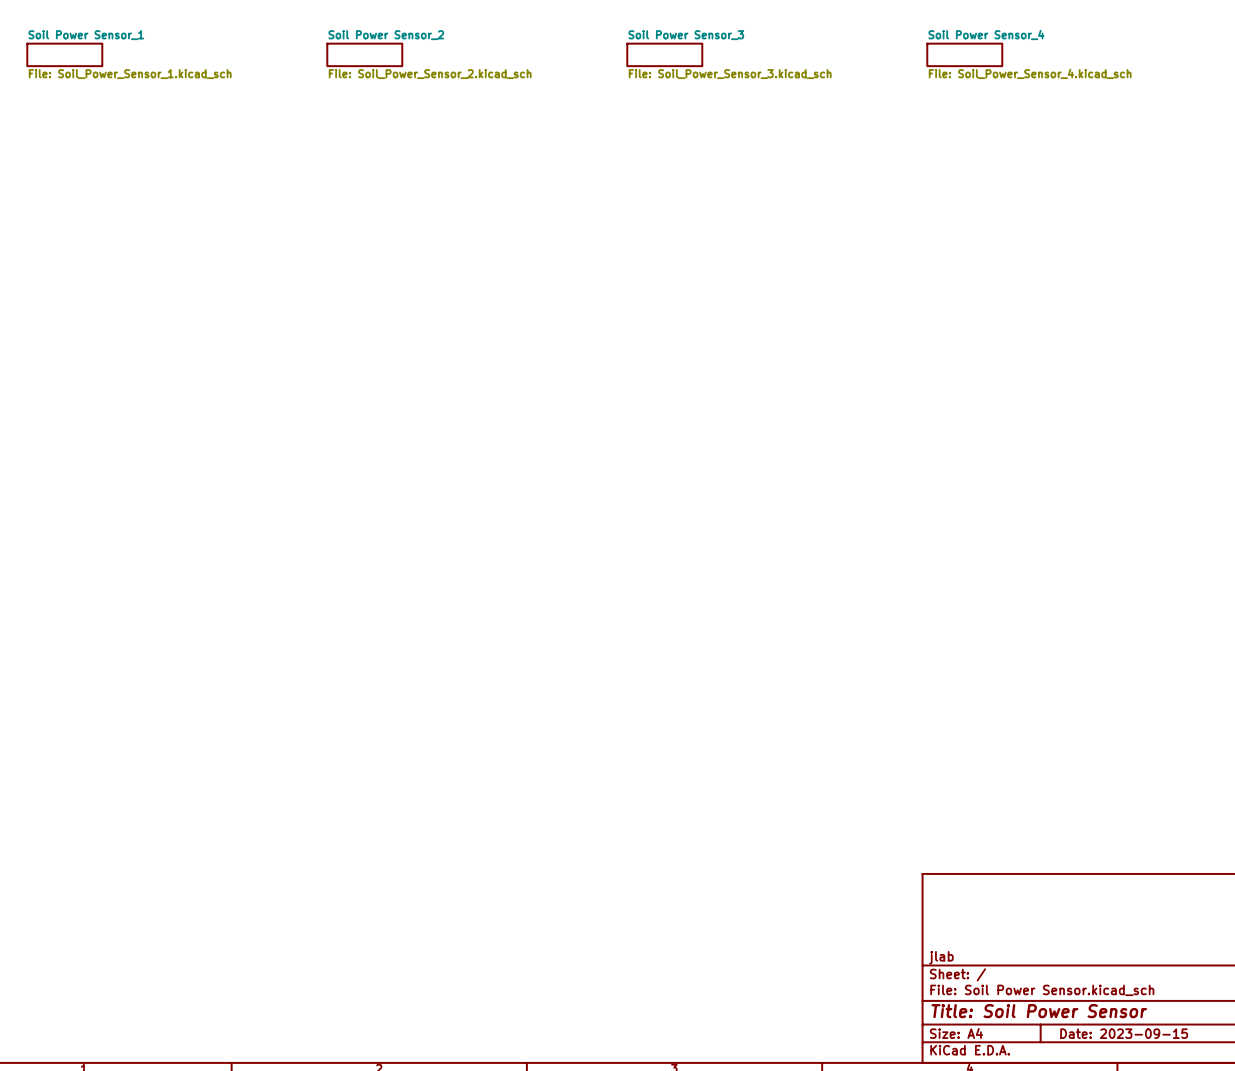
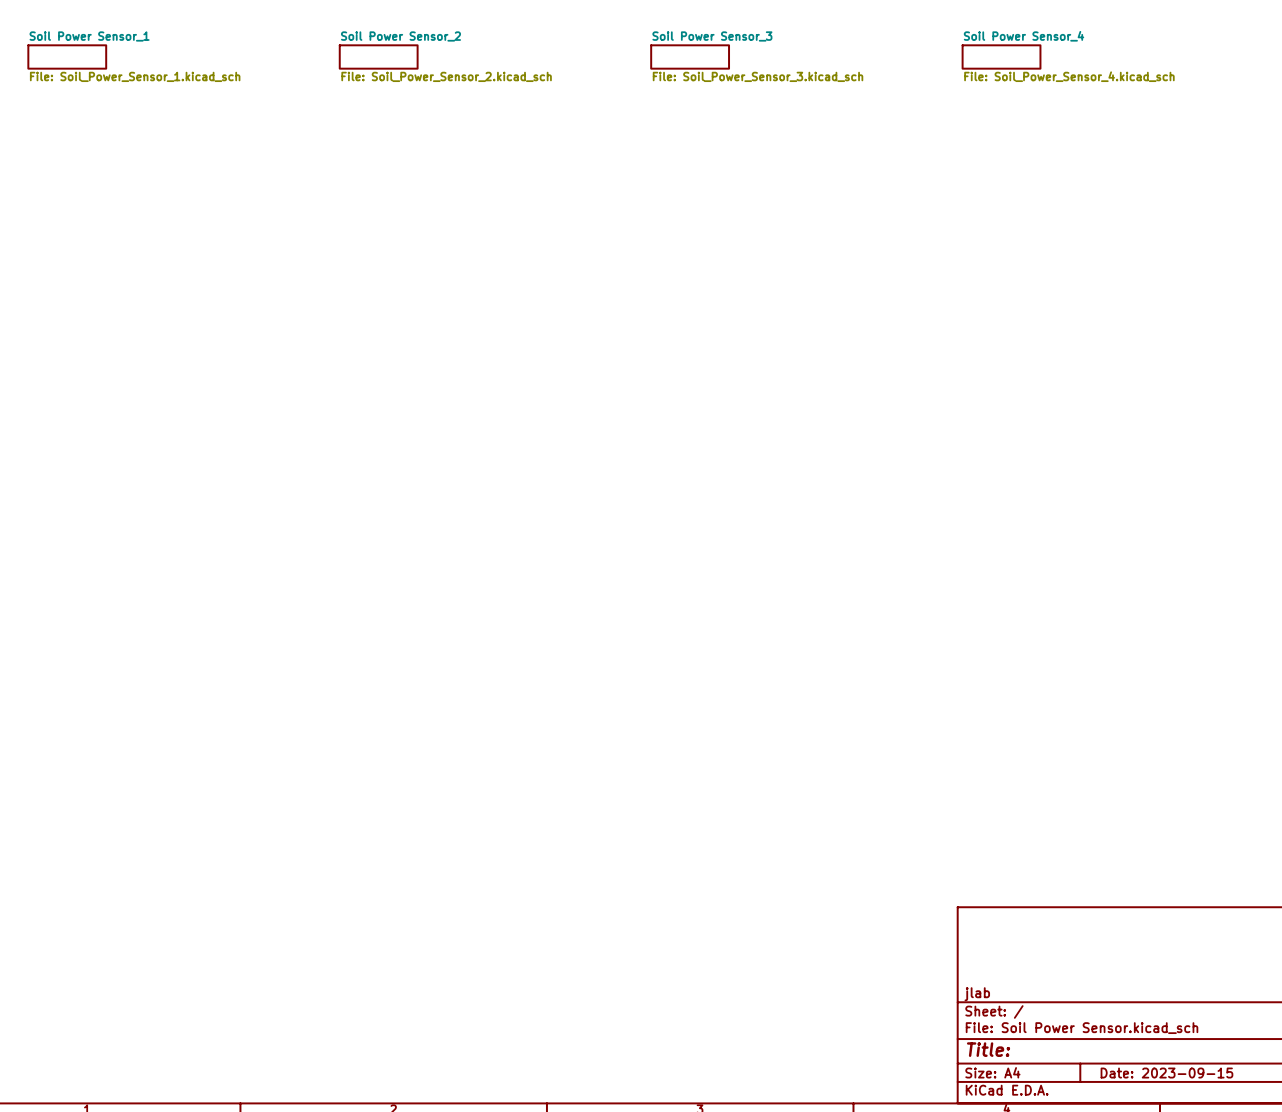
title block: Title: Soil Power Sensor (1039, 1011) -> Title: (988, 1049)

